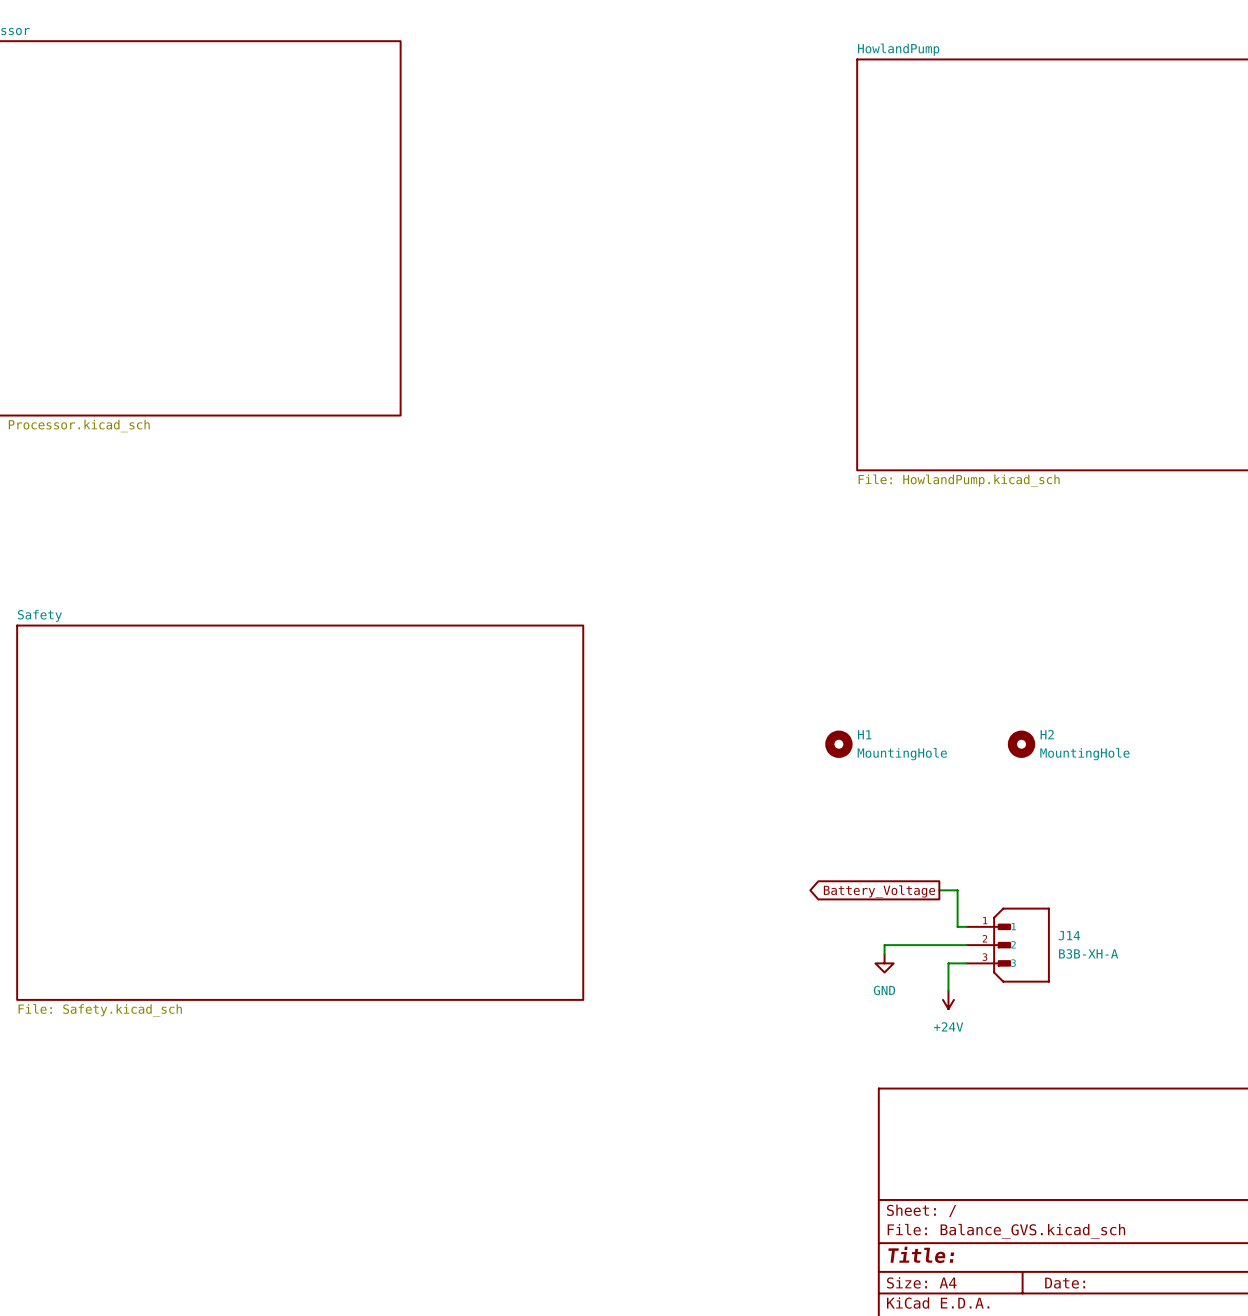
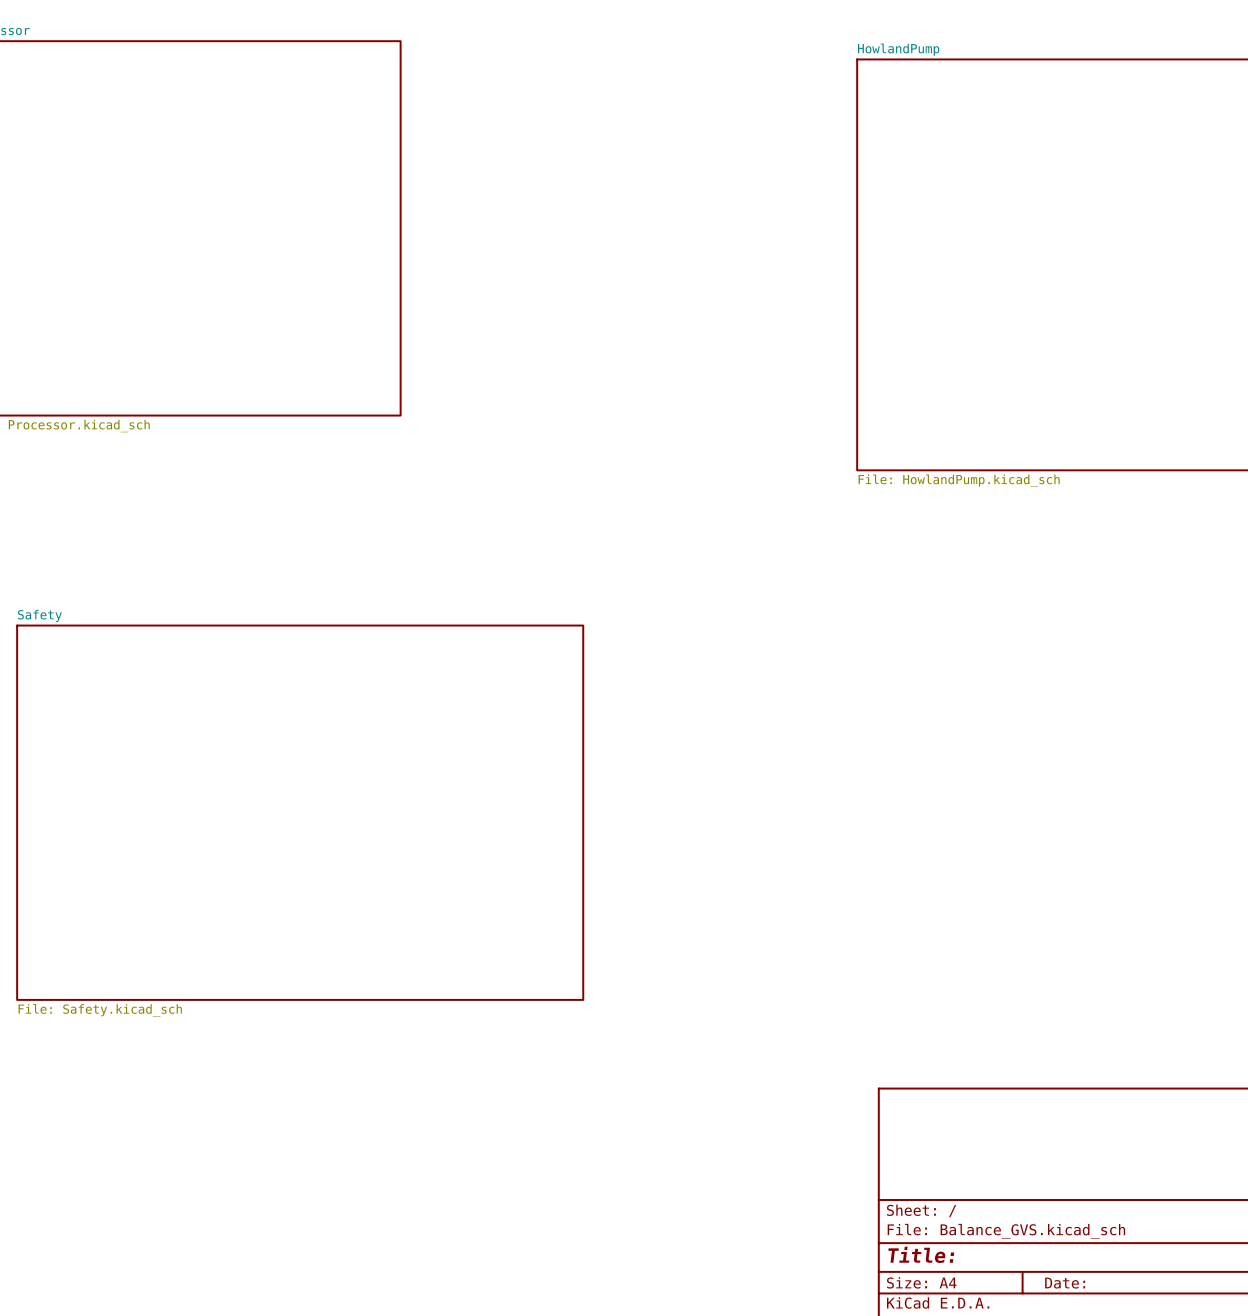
H1: MountingHole (838, 744) -> none
H2: MountingHole (1021, 744) -> none
wire: (939, 890) (957, 890) (957, 926) (966, 926) -> none
global label: Battery_Voltage (879, 891) -> none
wire: (966, 945) (884, 945) (884, 954) -> none
J14: B3B-XH-A (1008, 945) -> none
power symbol: GND (884, 963) -> none
wire: (966, 963) (948, 963) (948, 990) -> none
power symbol: +24V (948, 999) -> none

